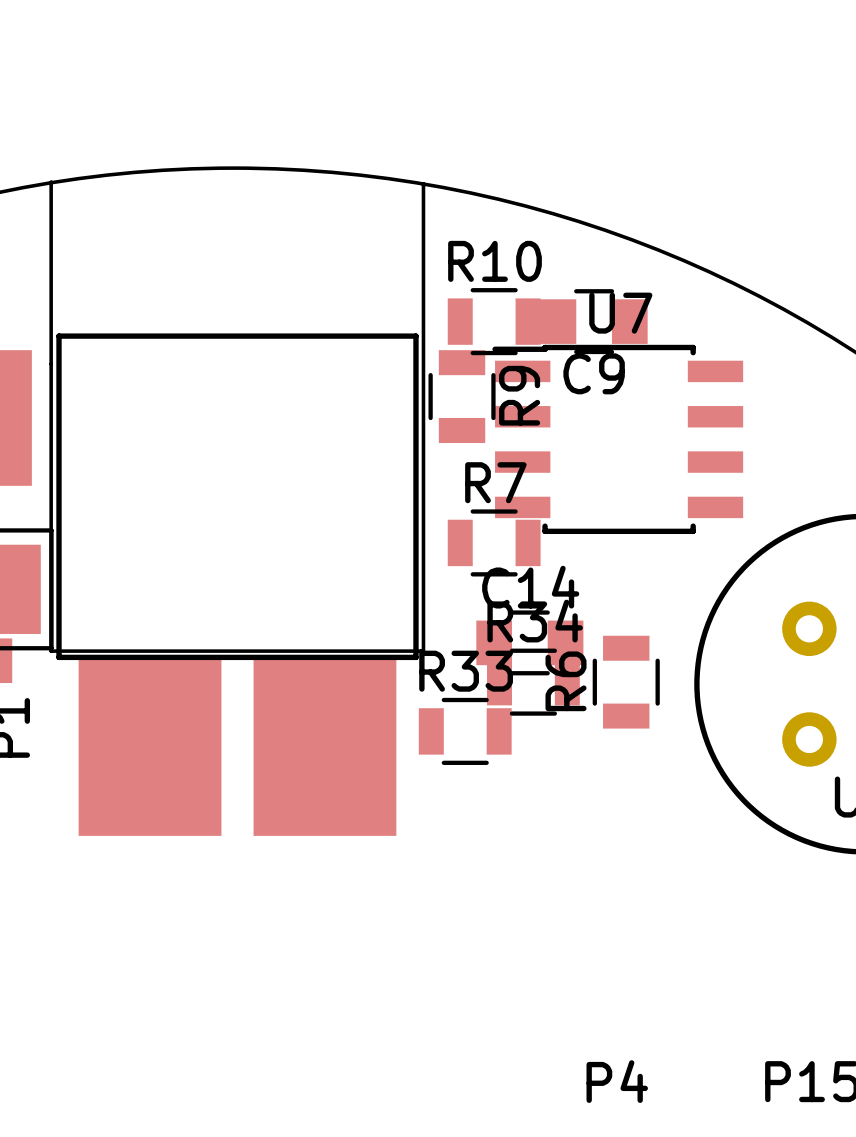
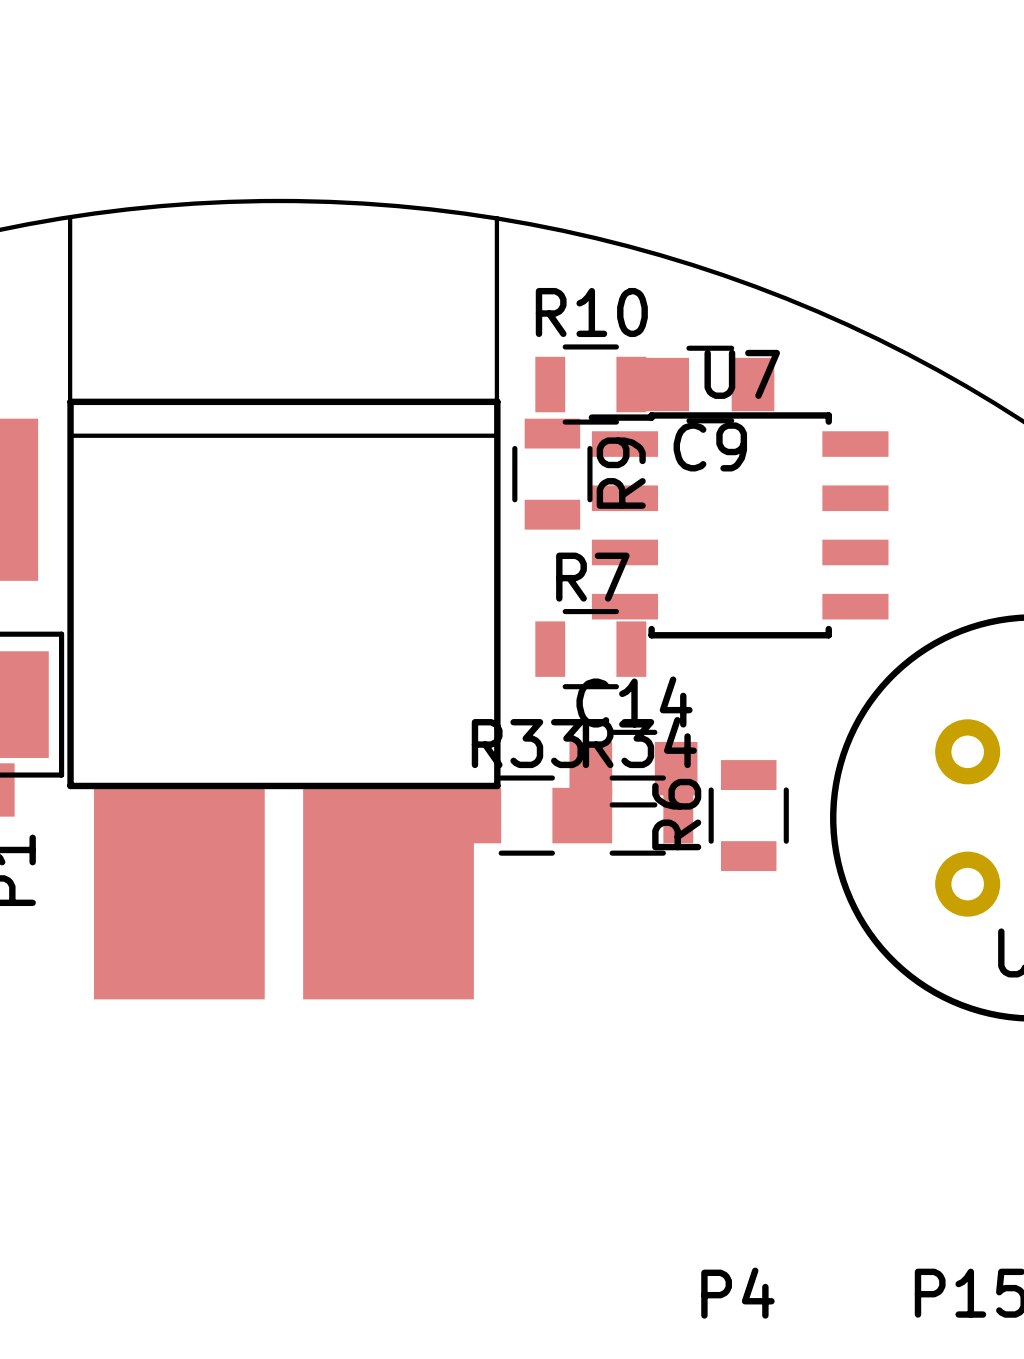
board edge: (51, 182) (51, 651) (423, 651) (423, 183) -> none
board edge: none -> (70, 218) (70, 435) (496, 435) (496, 218)
R33 position: (465, 731) -> (526, 815)

